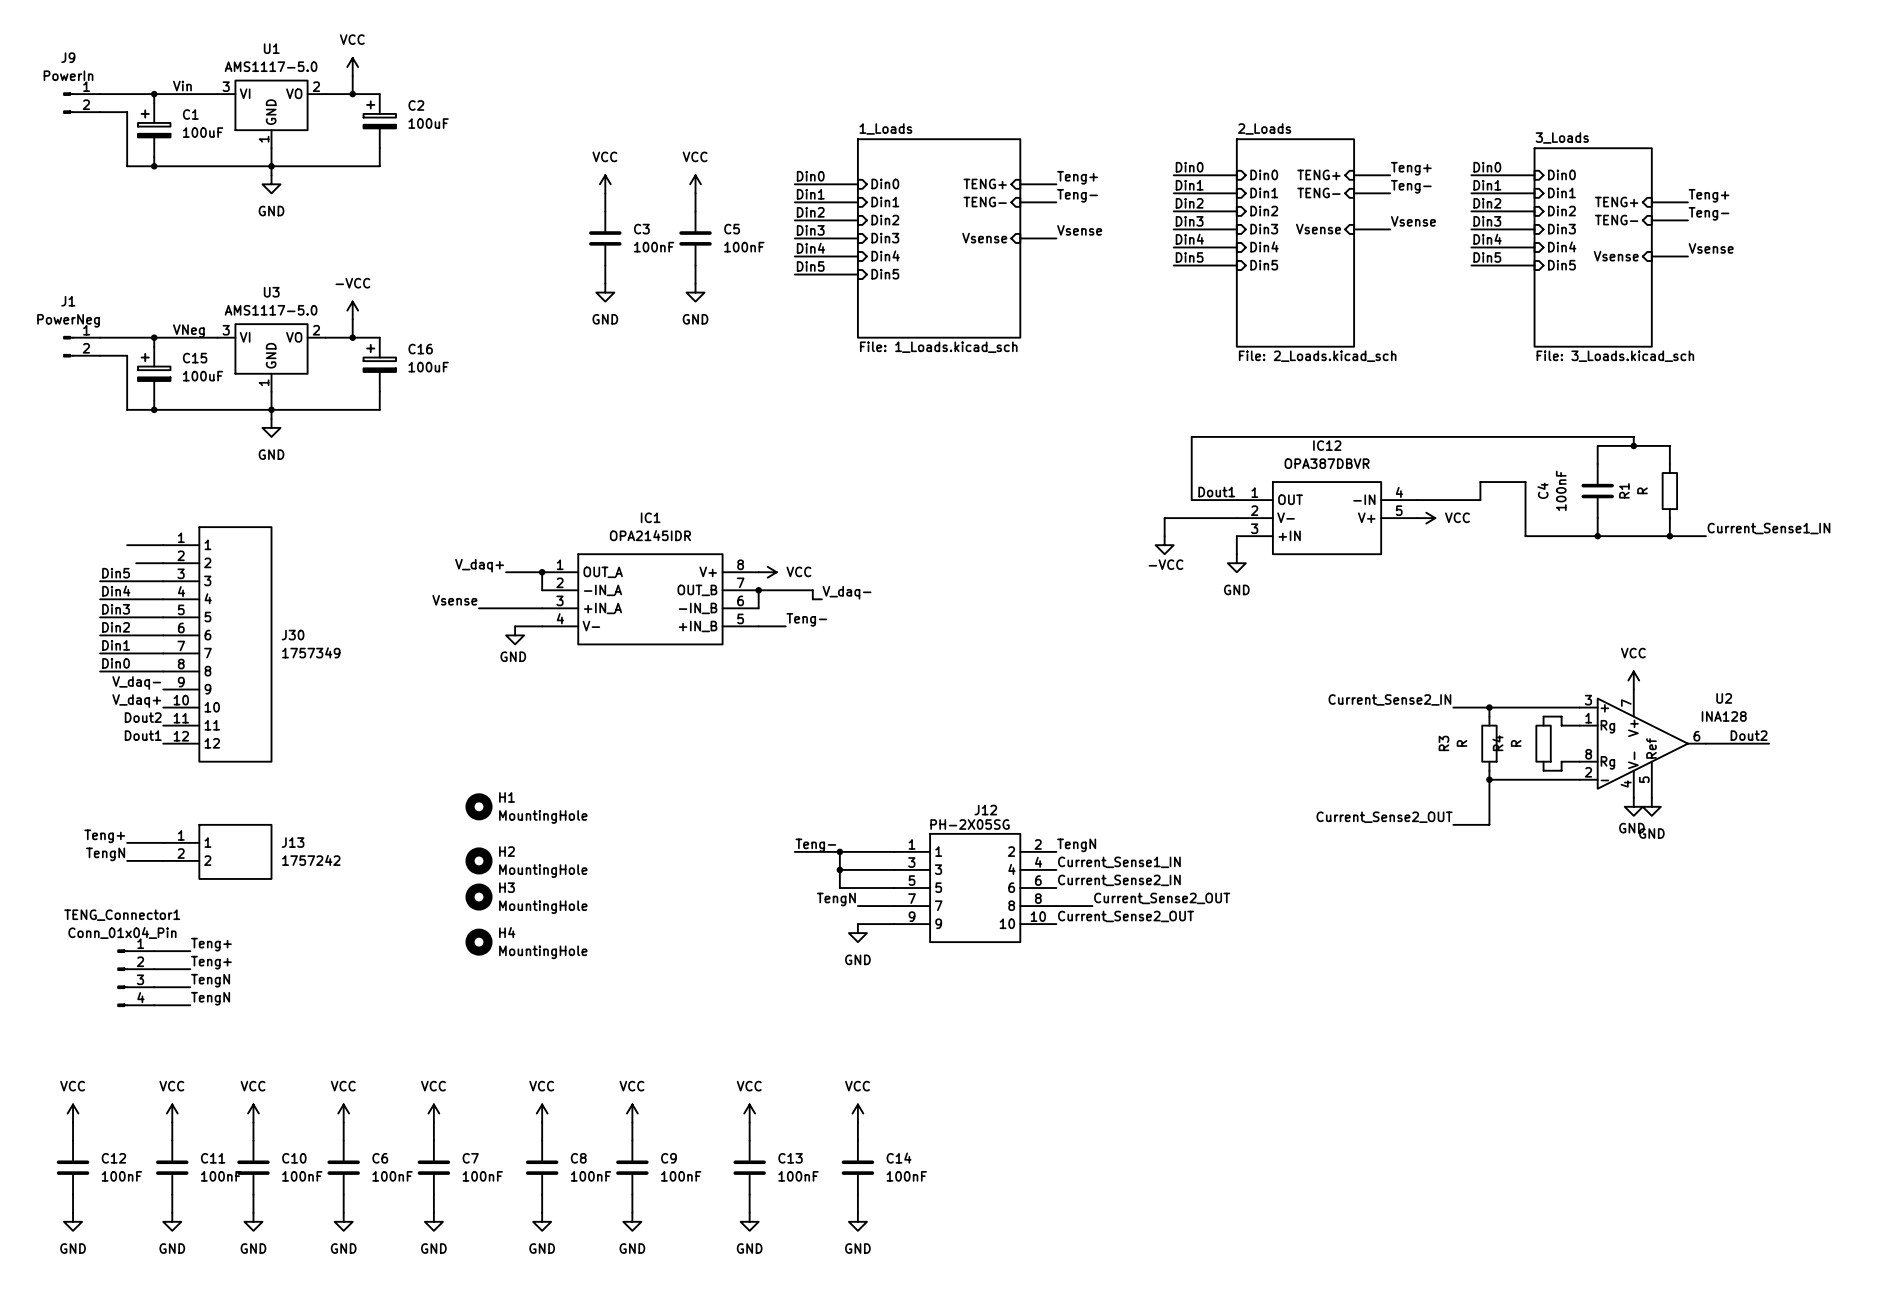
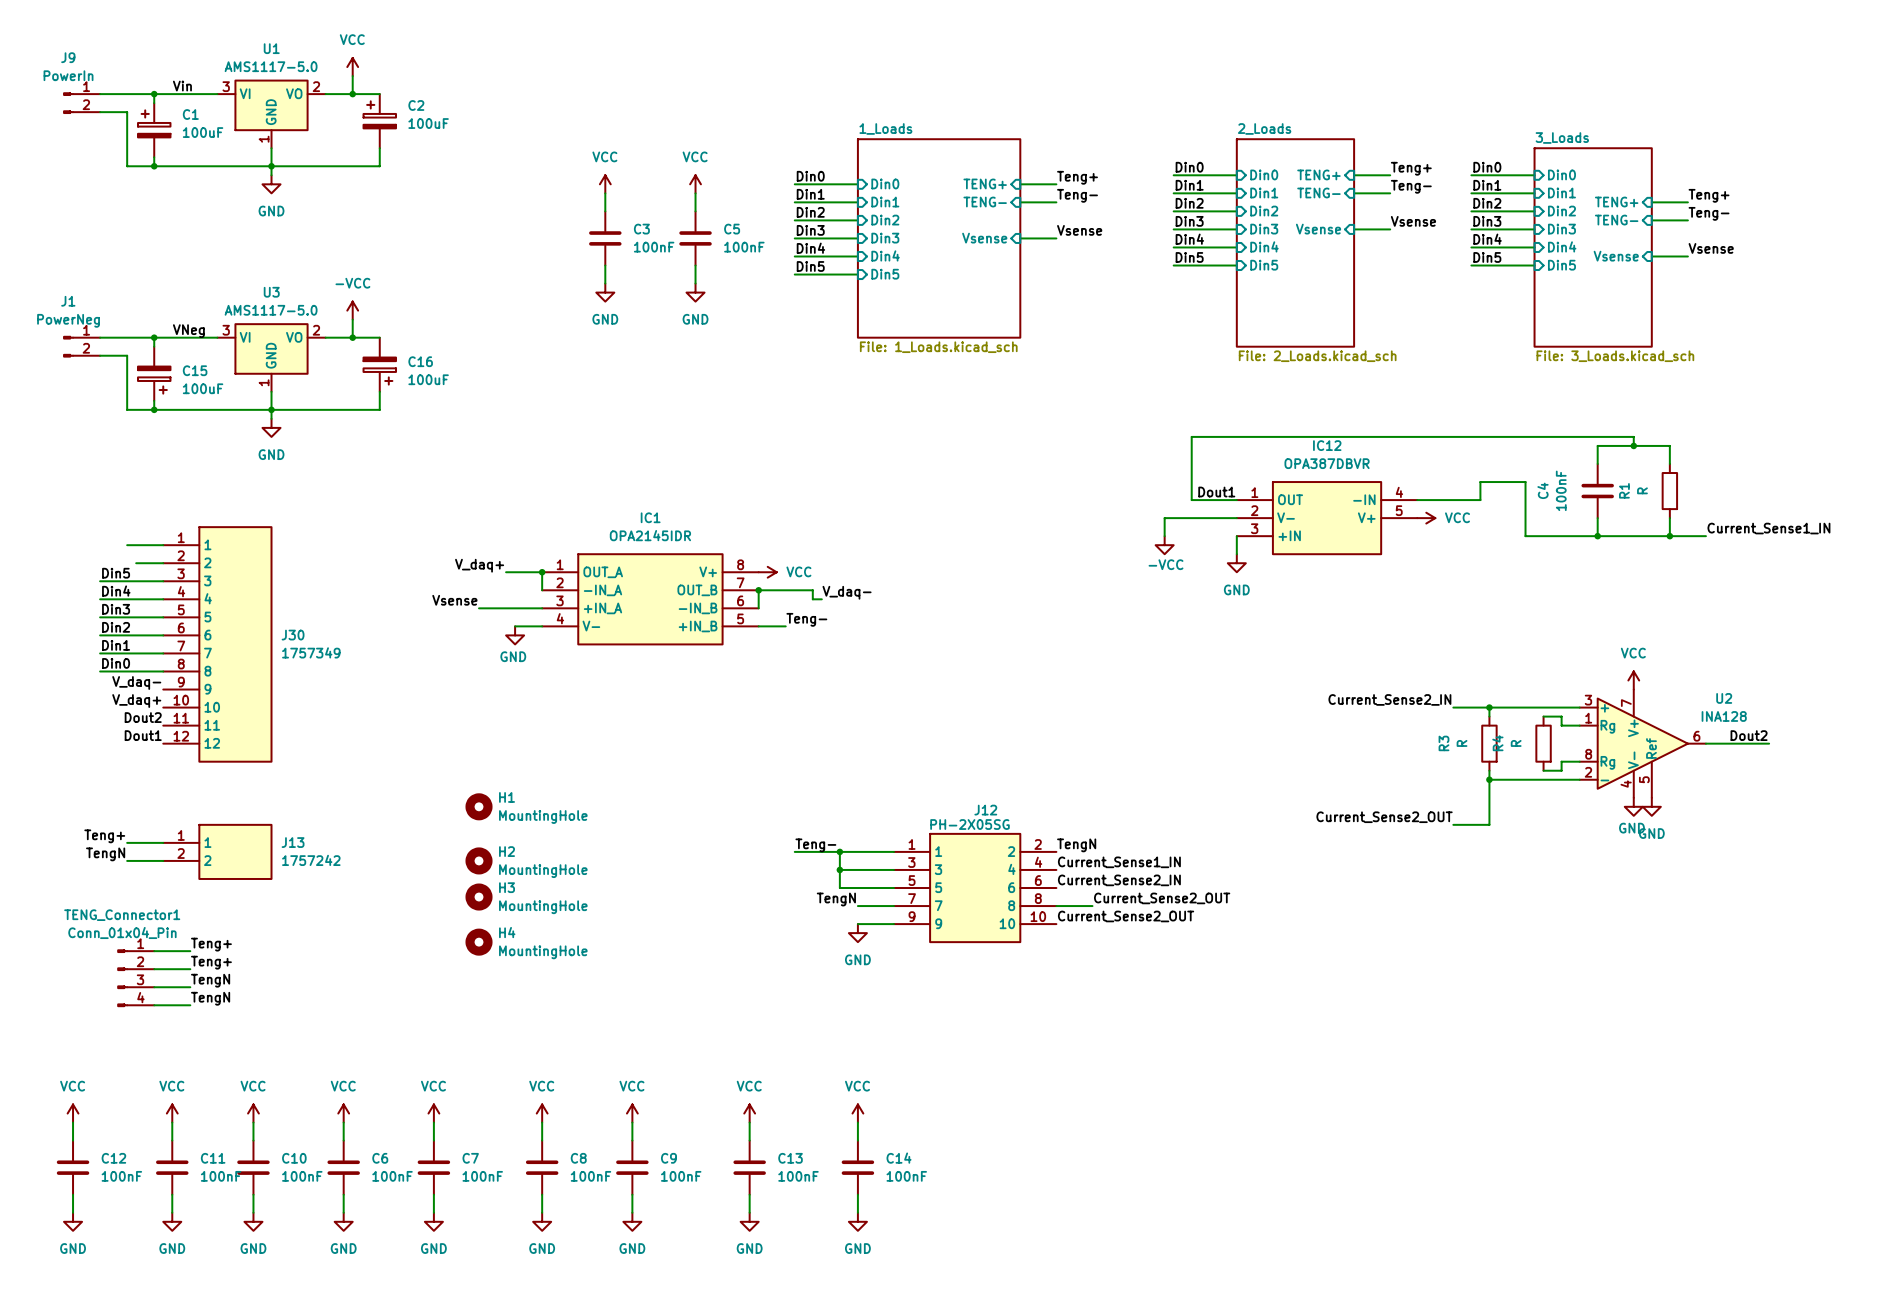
C16 rotation: 0° (379, 358) -> 180° (379, 371)
C15 rotation: 0° (154, 367) -> 180° (154, 380)

